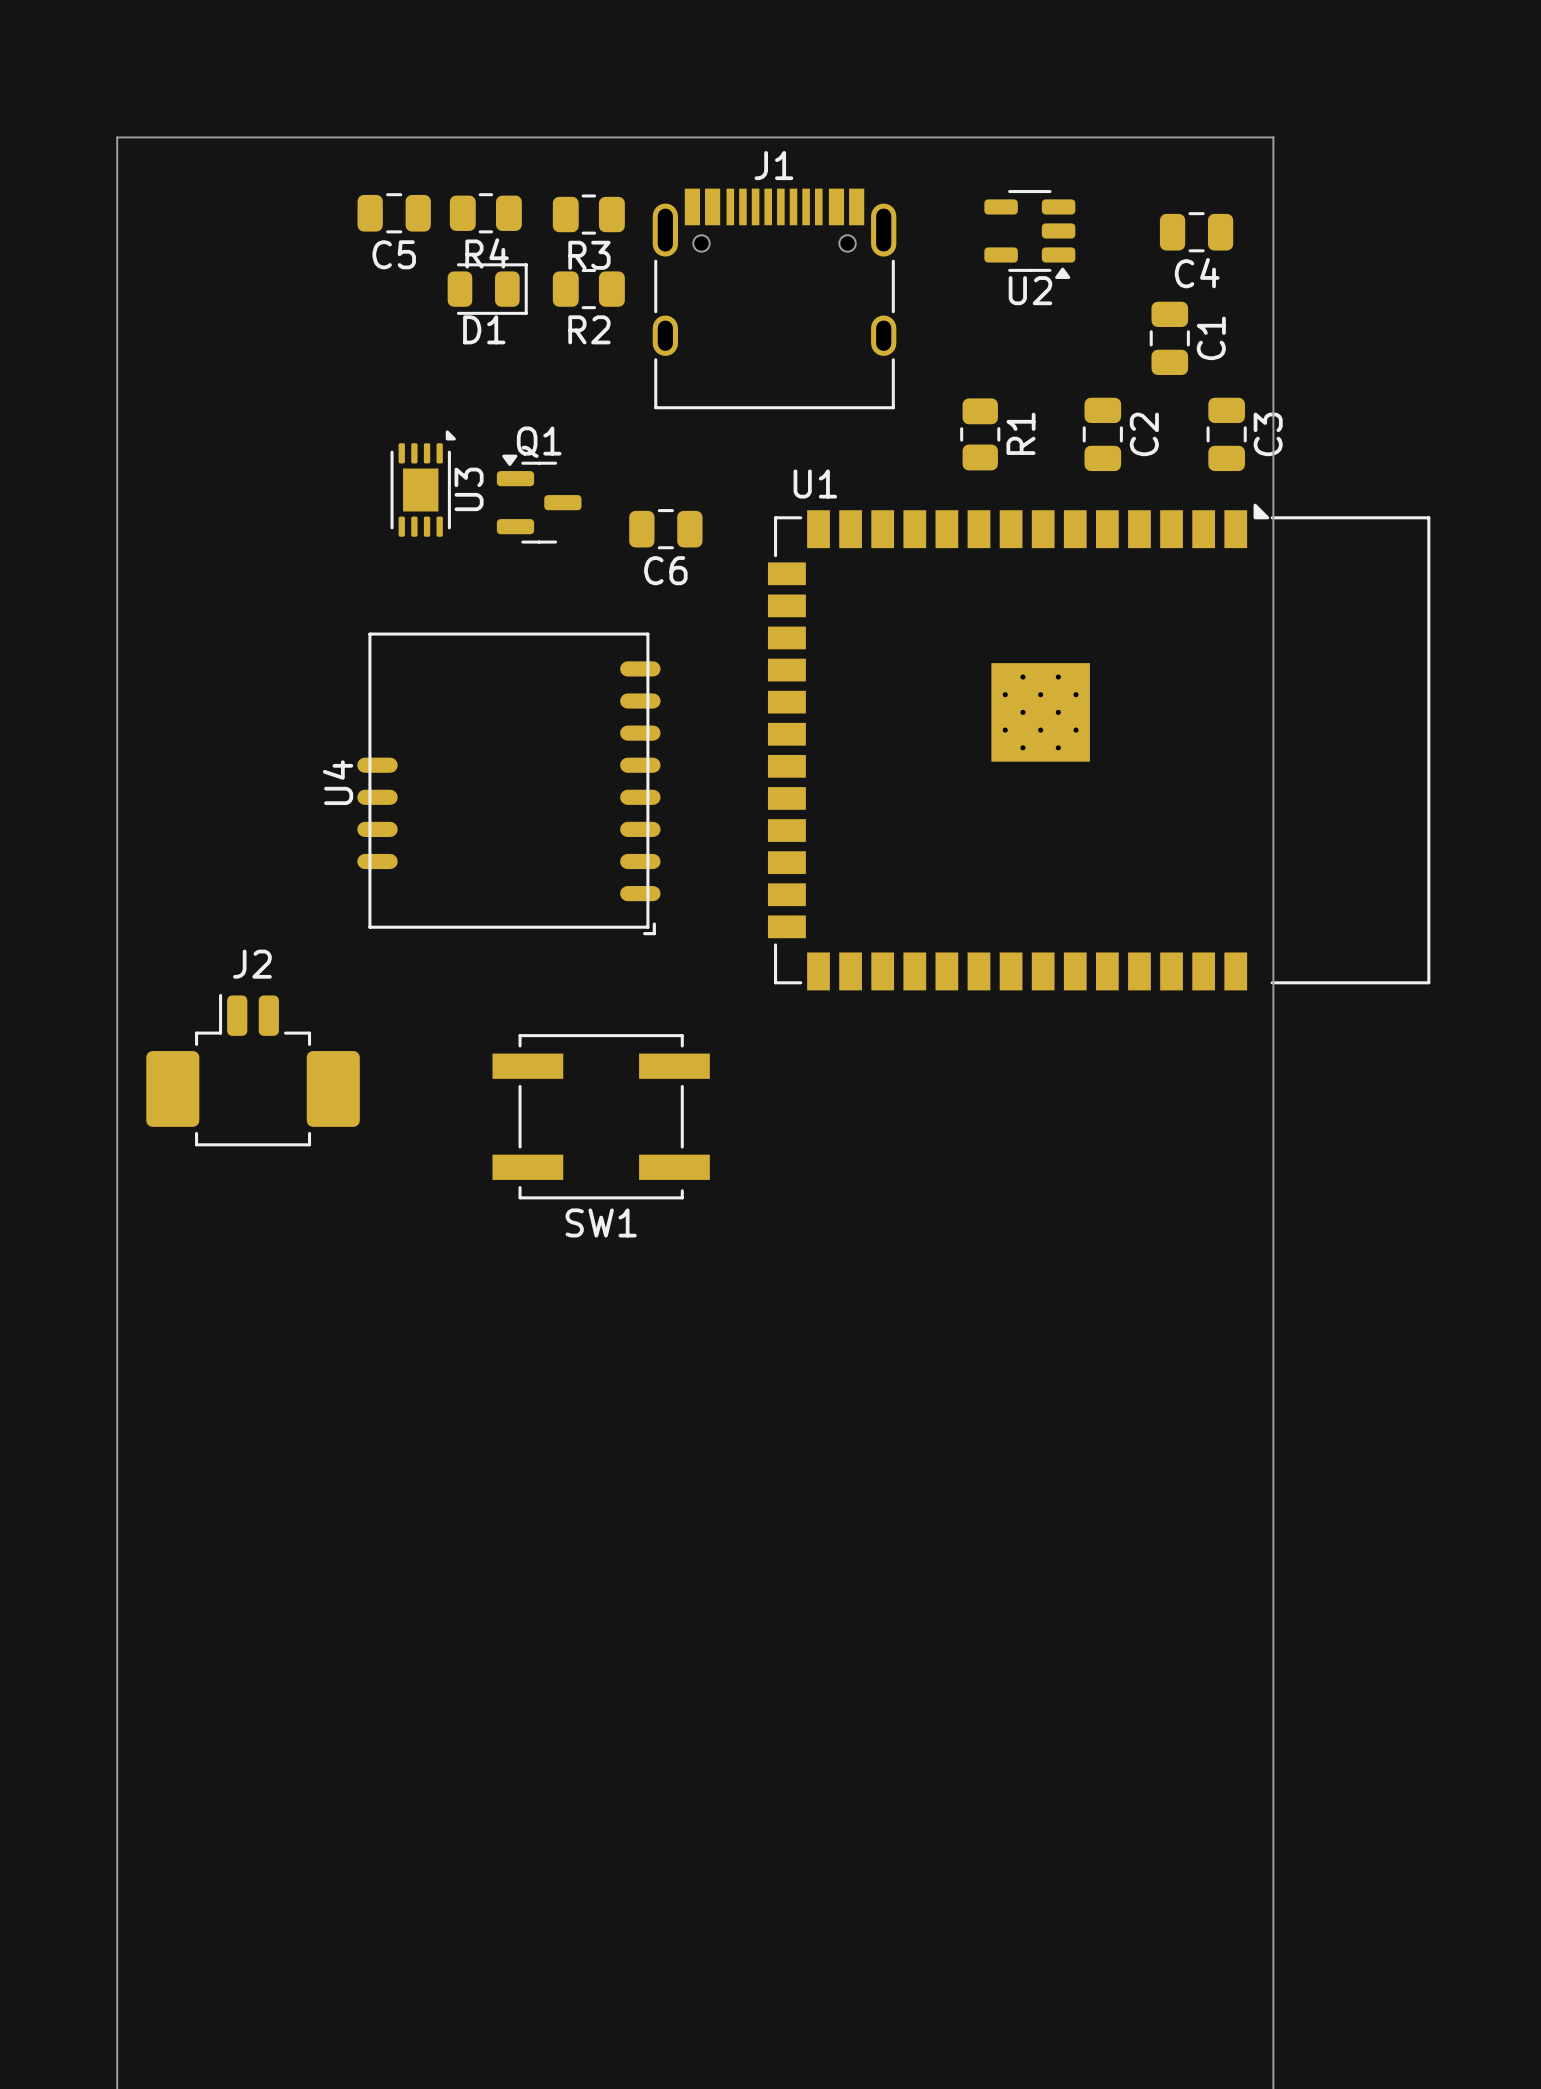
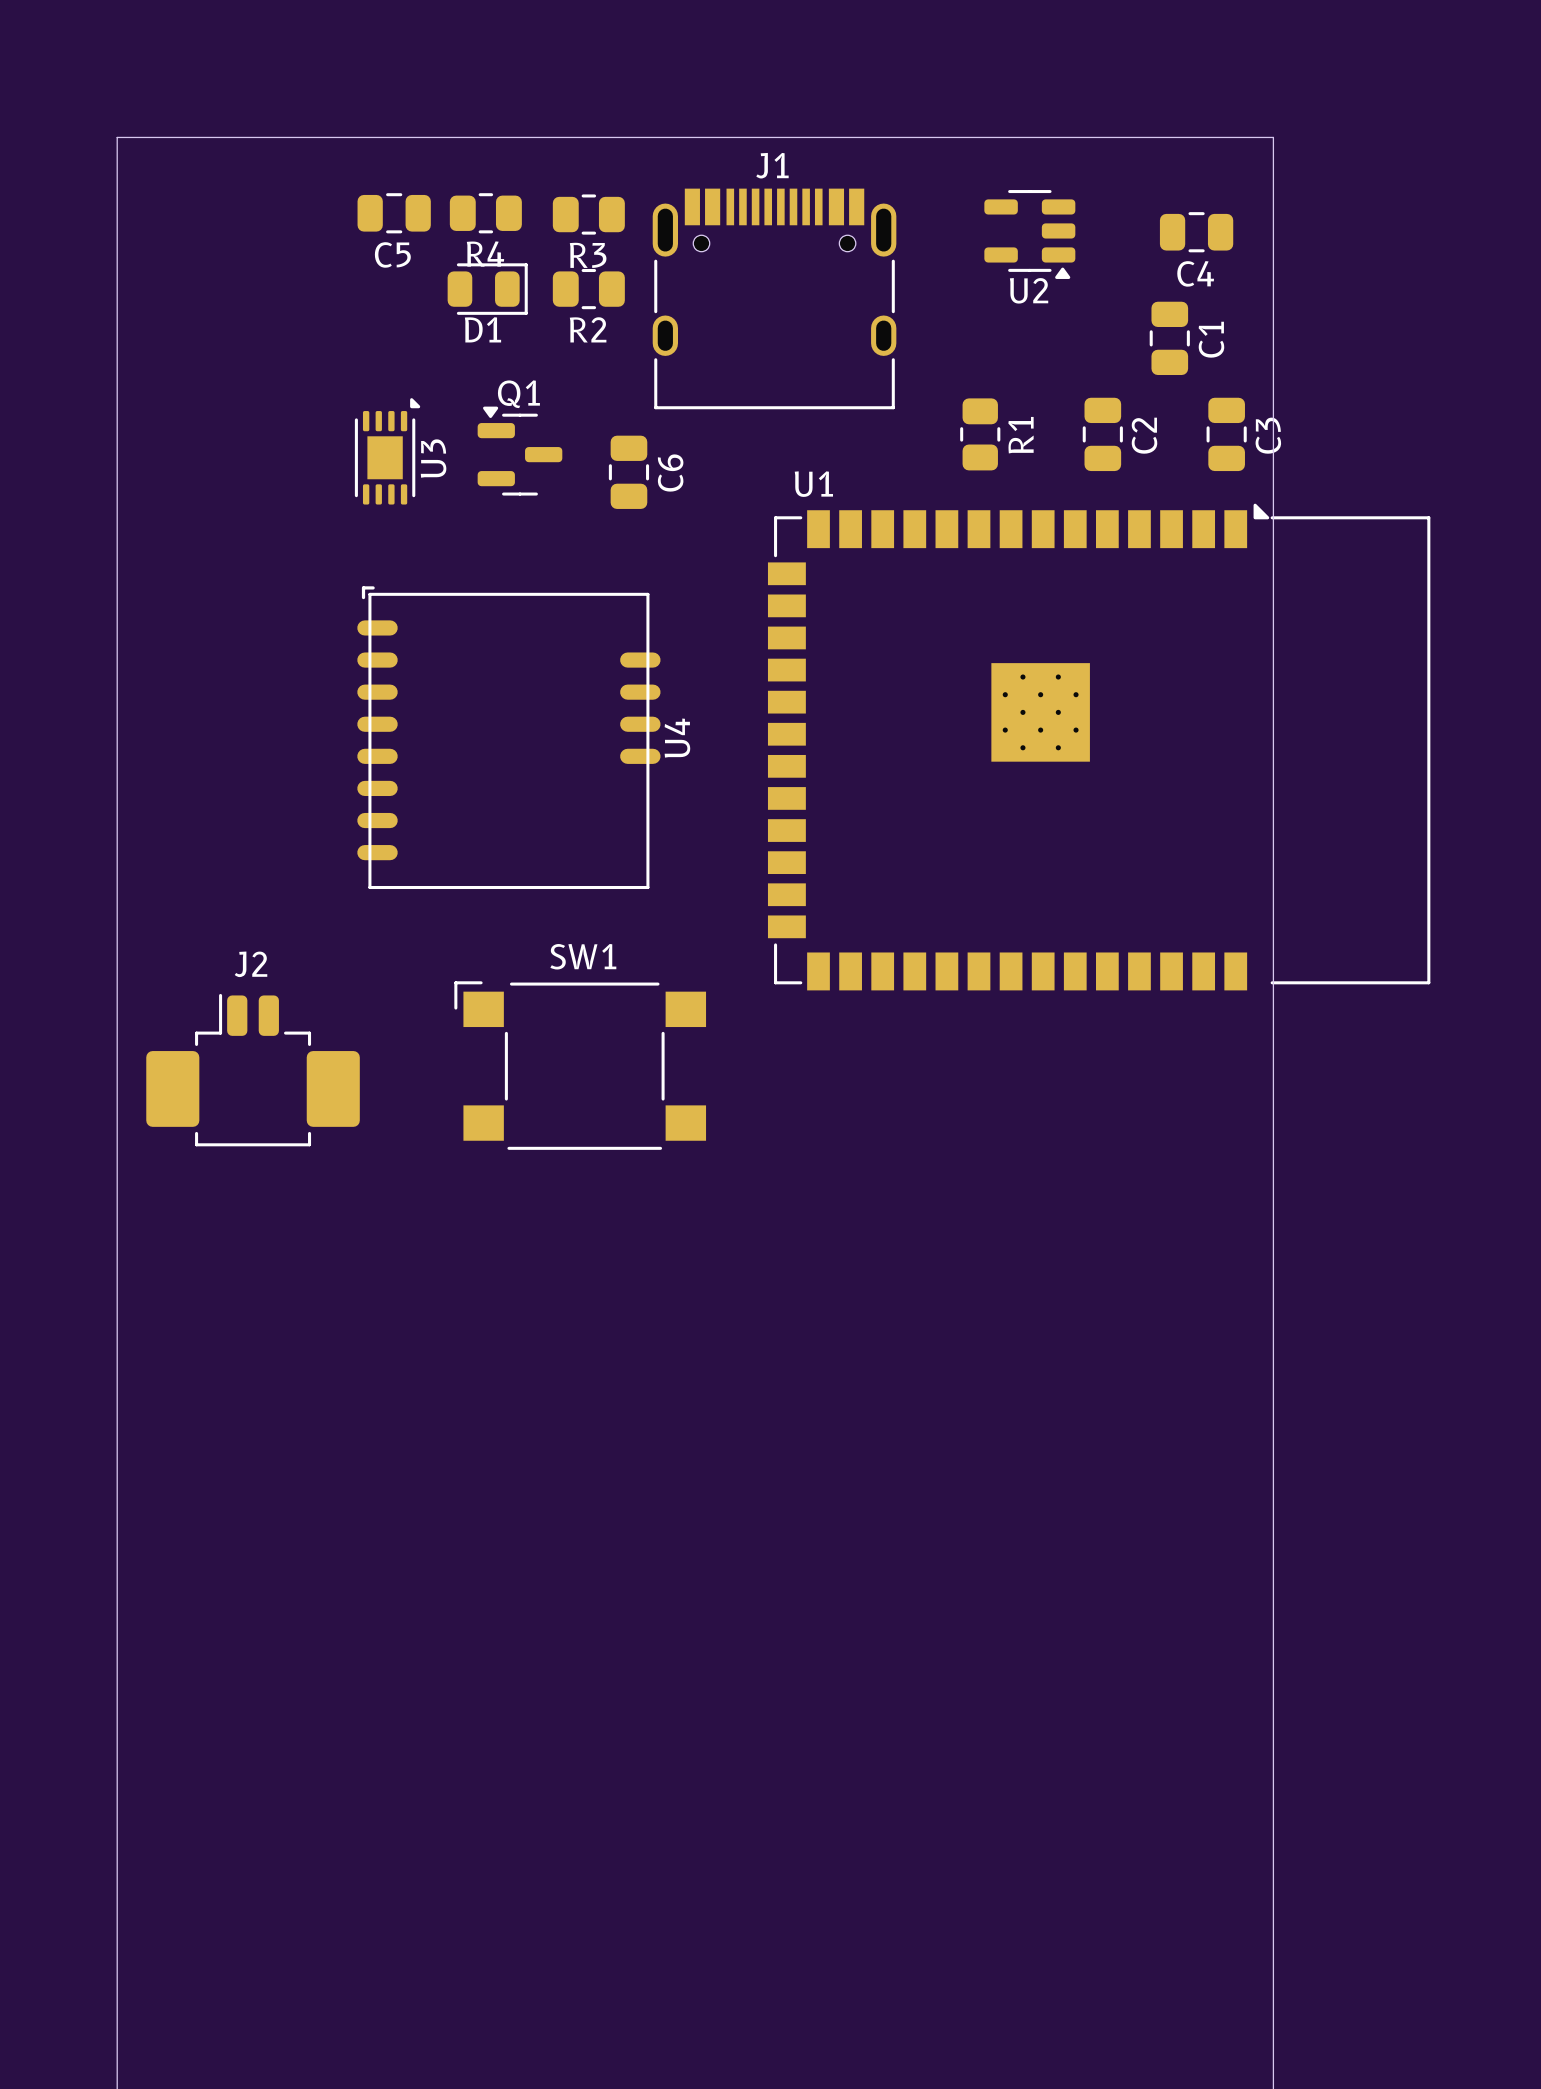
U3 position: (423, 483) -> (387, 451)
Q1 position: (539, 499) -> (519, 451)
C6 rotation: 0° (665, 529) -> 90° clockwise (628, 472)
C6 position: (665, 529) -> (628, 472)
C6 name position: C6 (665, 570) -> C6 (670, 473)
U4 rotation: 0° (508, 783) -> 180° (508, 737)
SW1 footprint: [492, 1034, 710, 1200] -> [454, 981, 707, 1150]
SW1 name position: SW1 (601, 1222) -> SW1 (583, 956)

